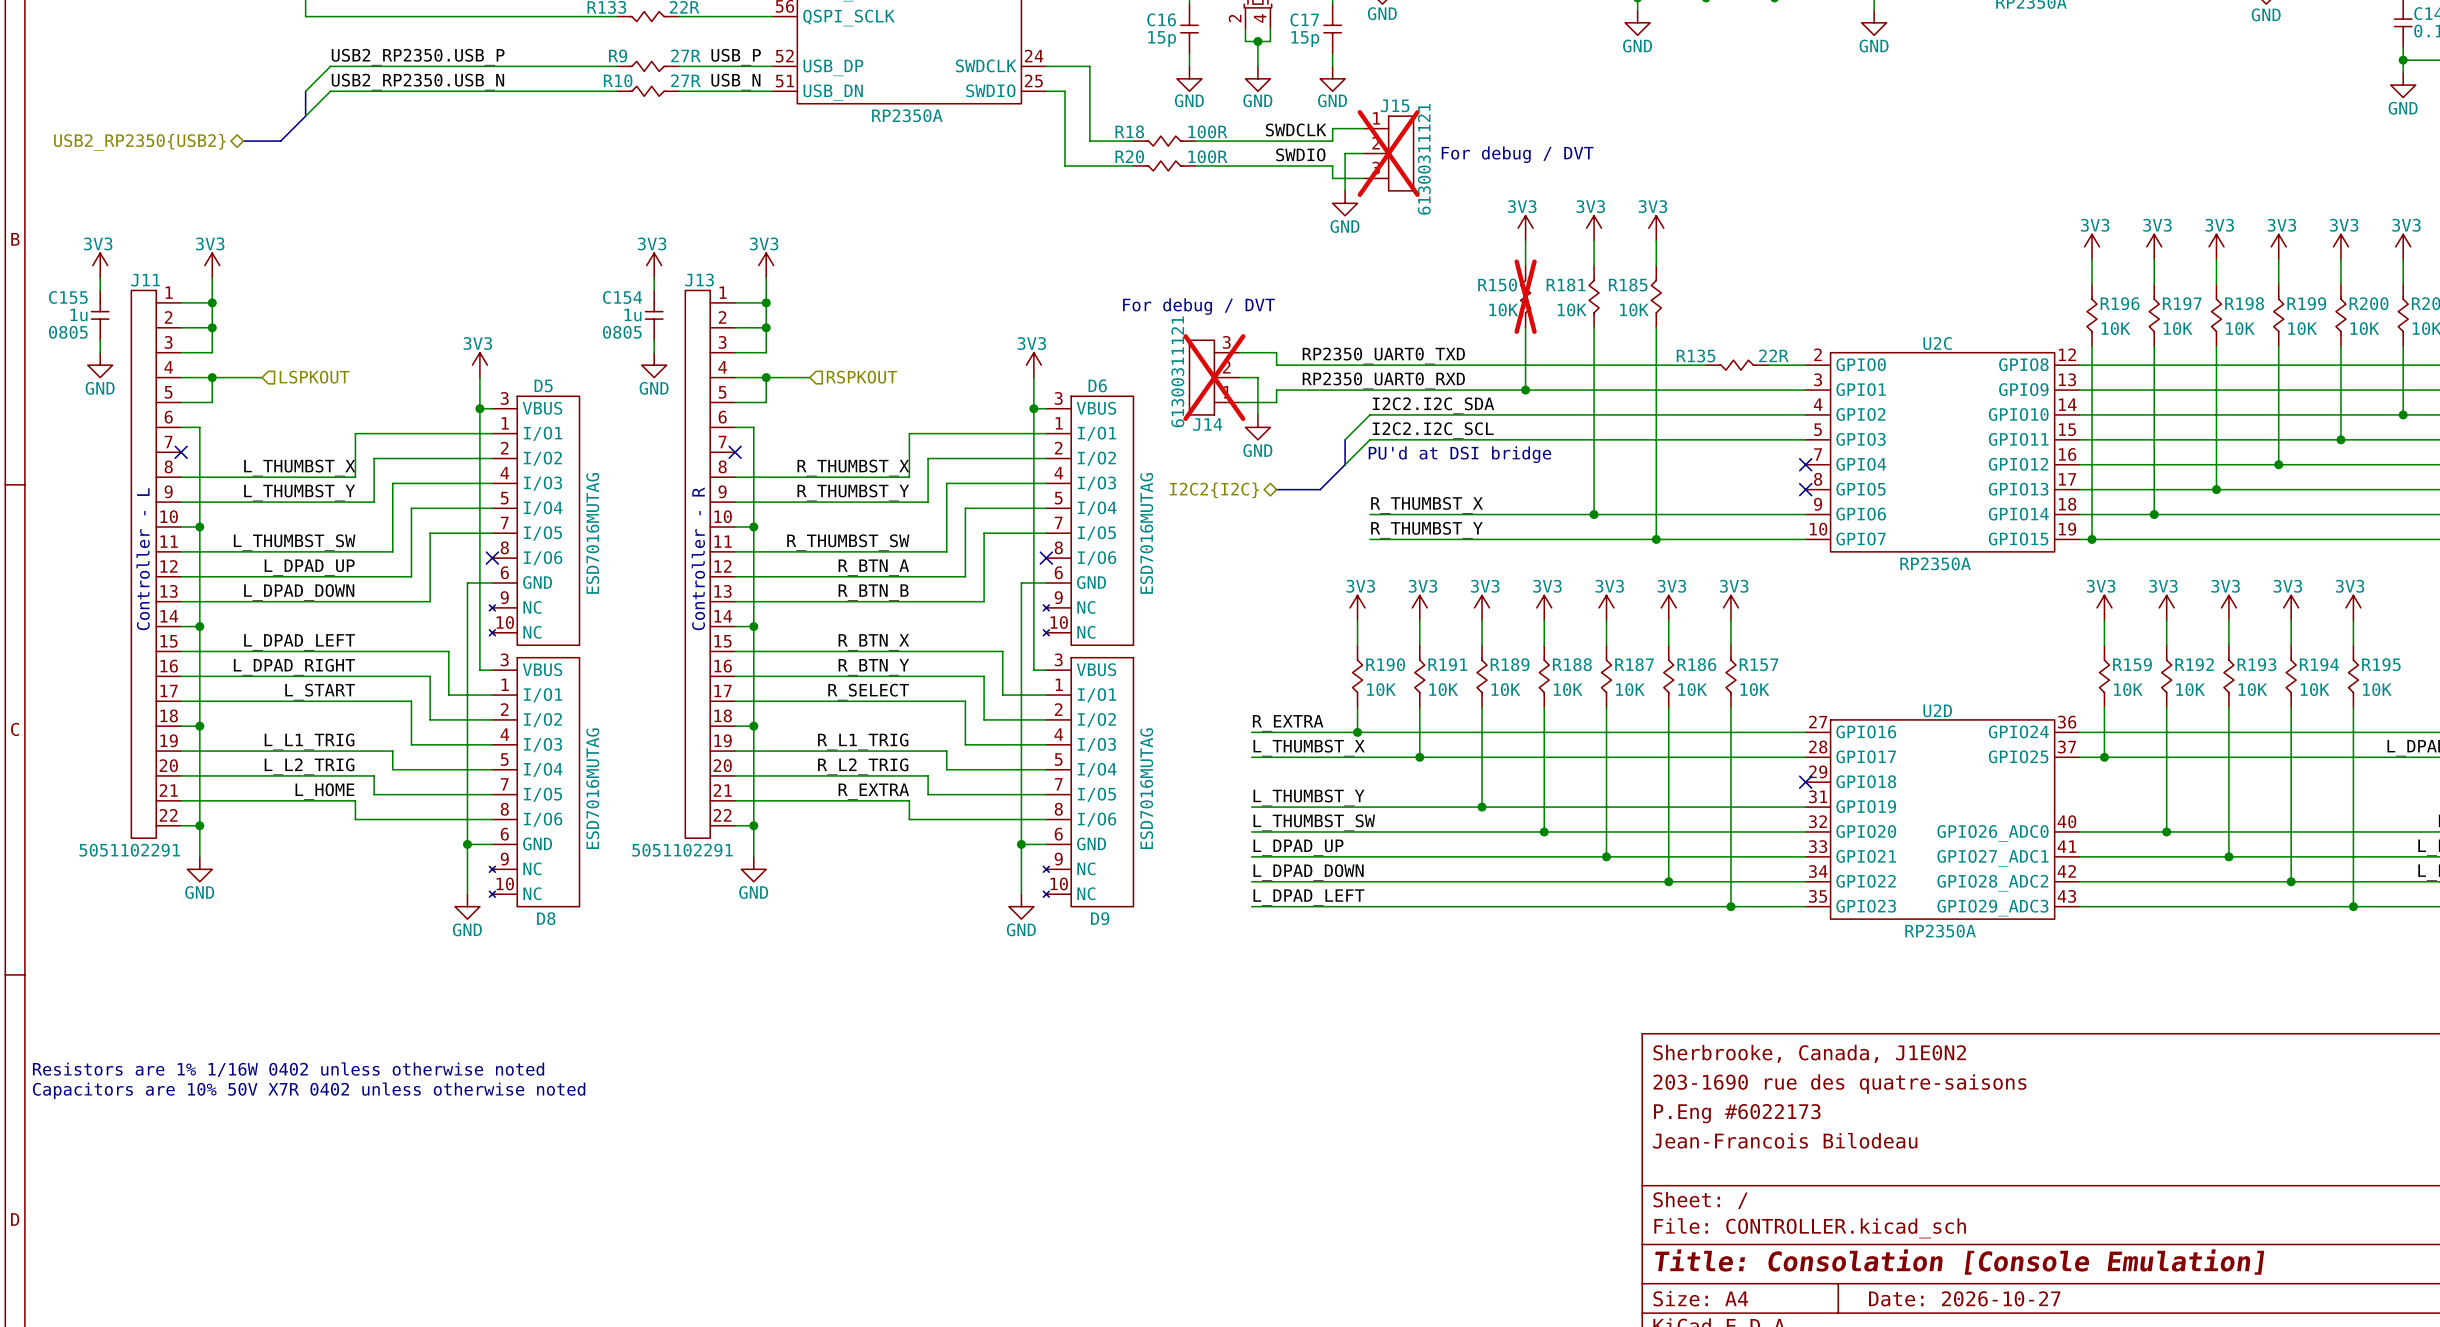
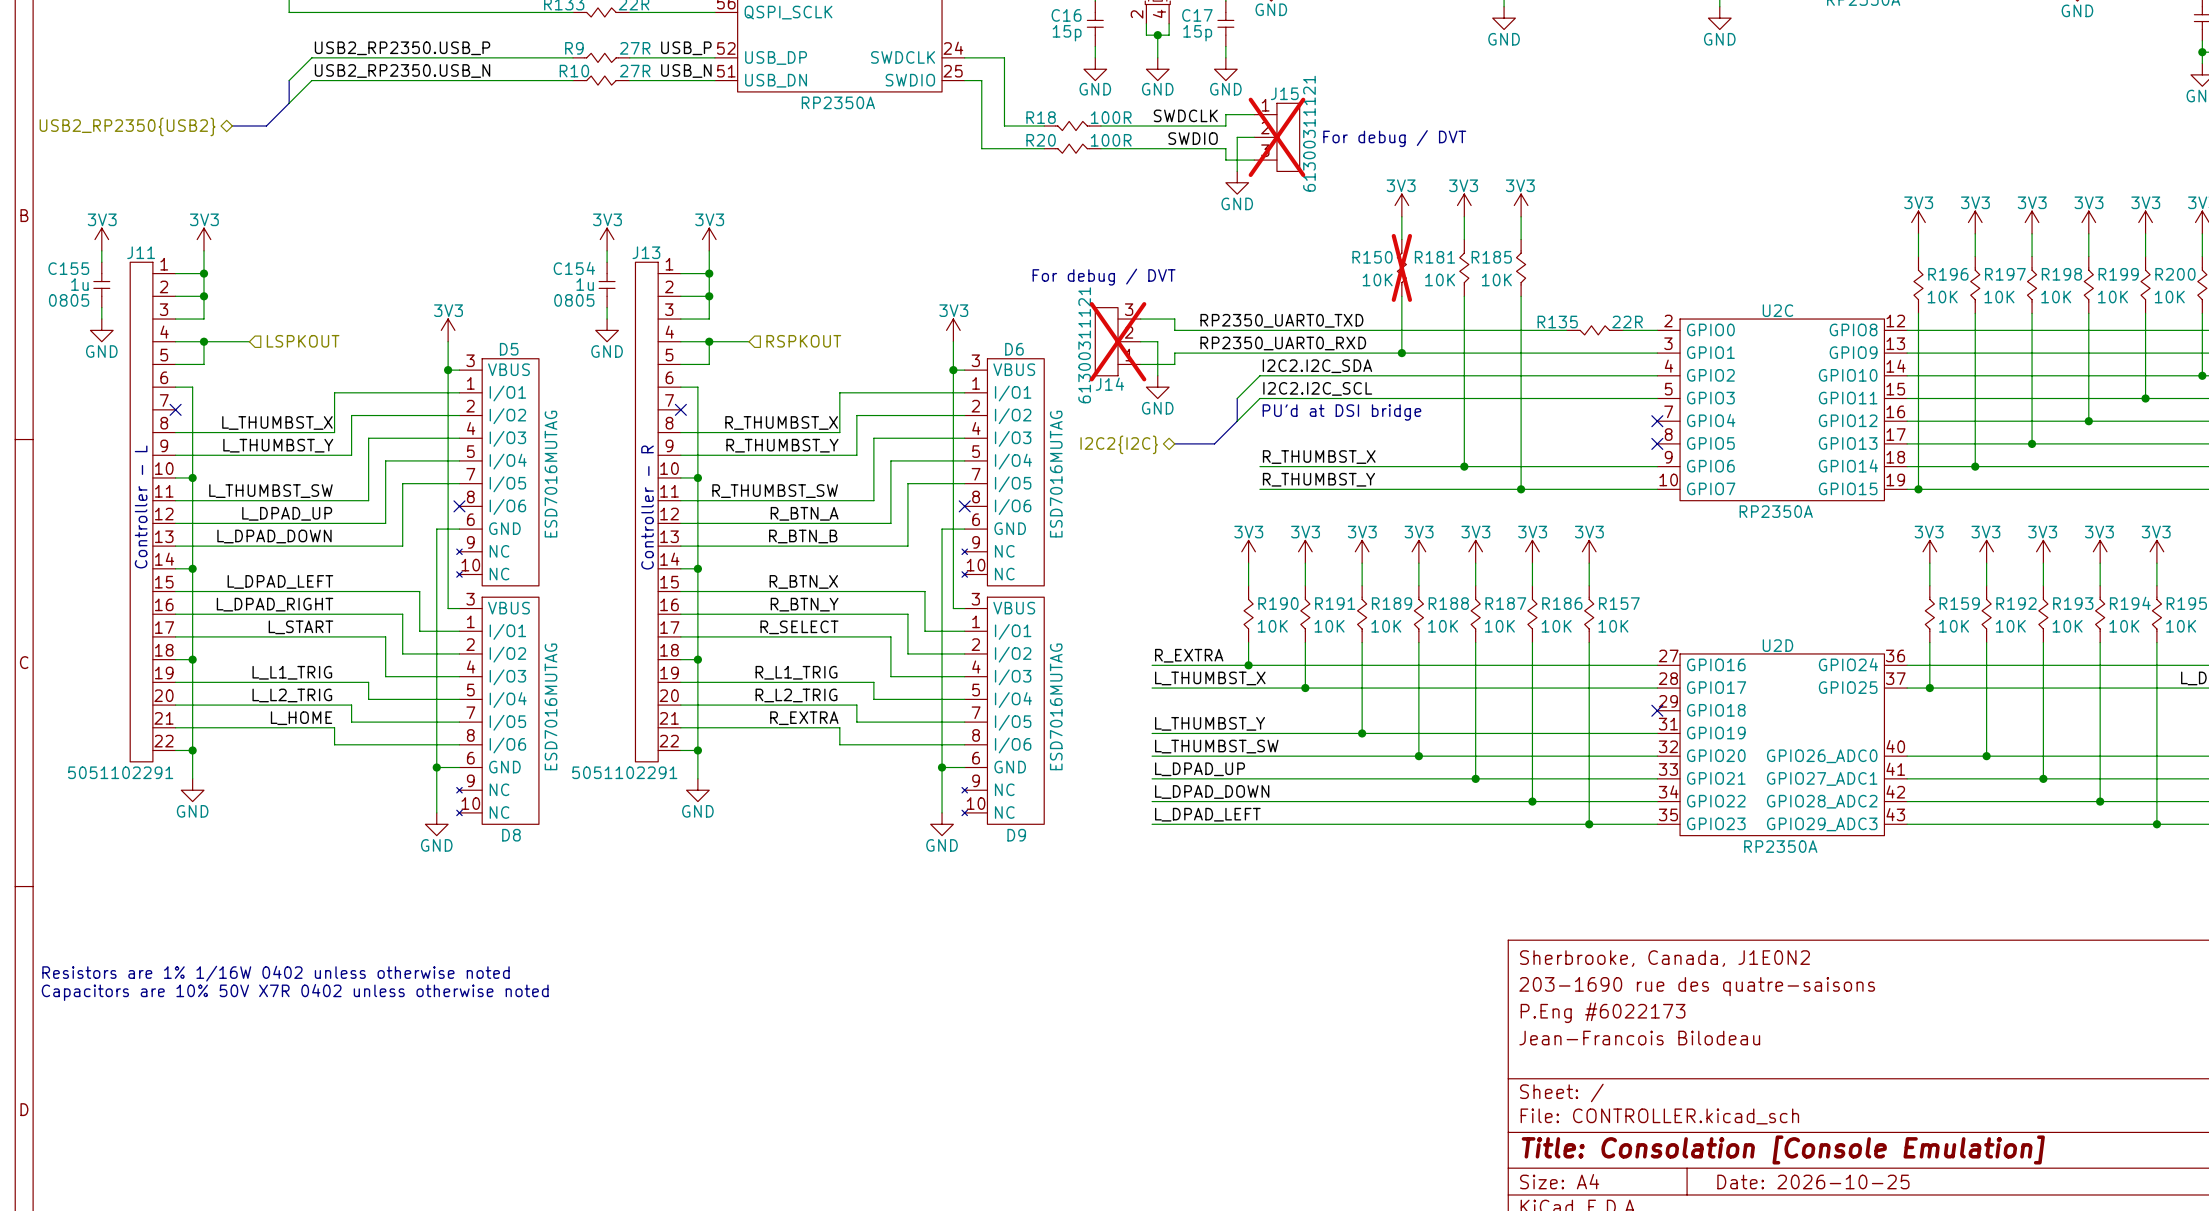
title block: Date: 2026-10-27 (1964, 1298) -> Date: 2026-10-25 (1813, 1181)

